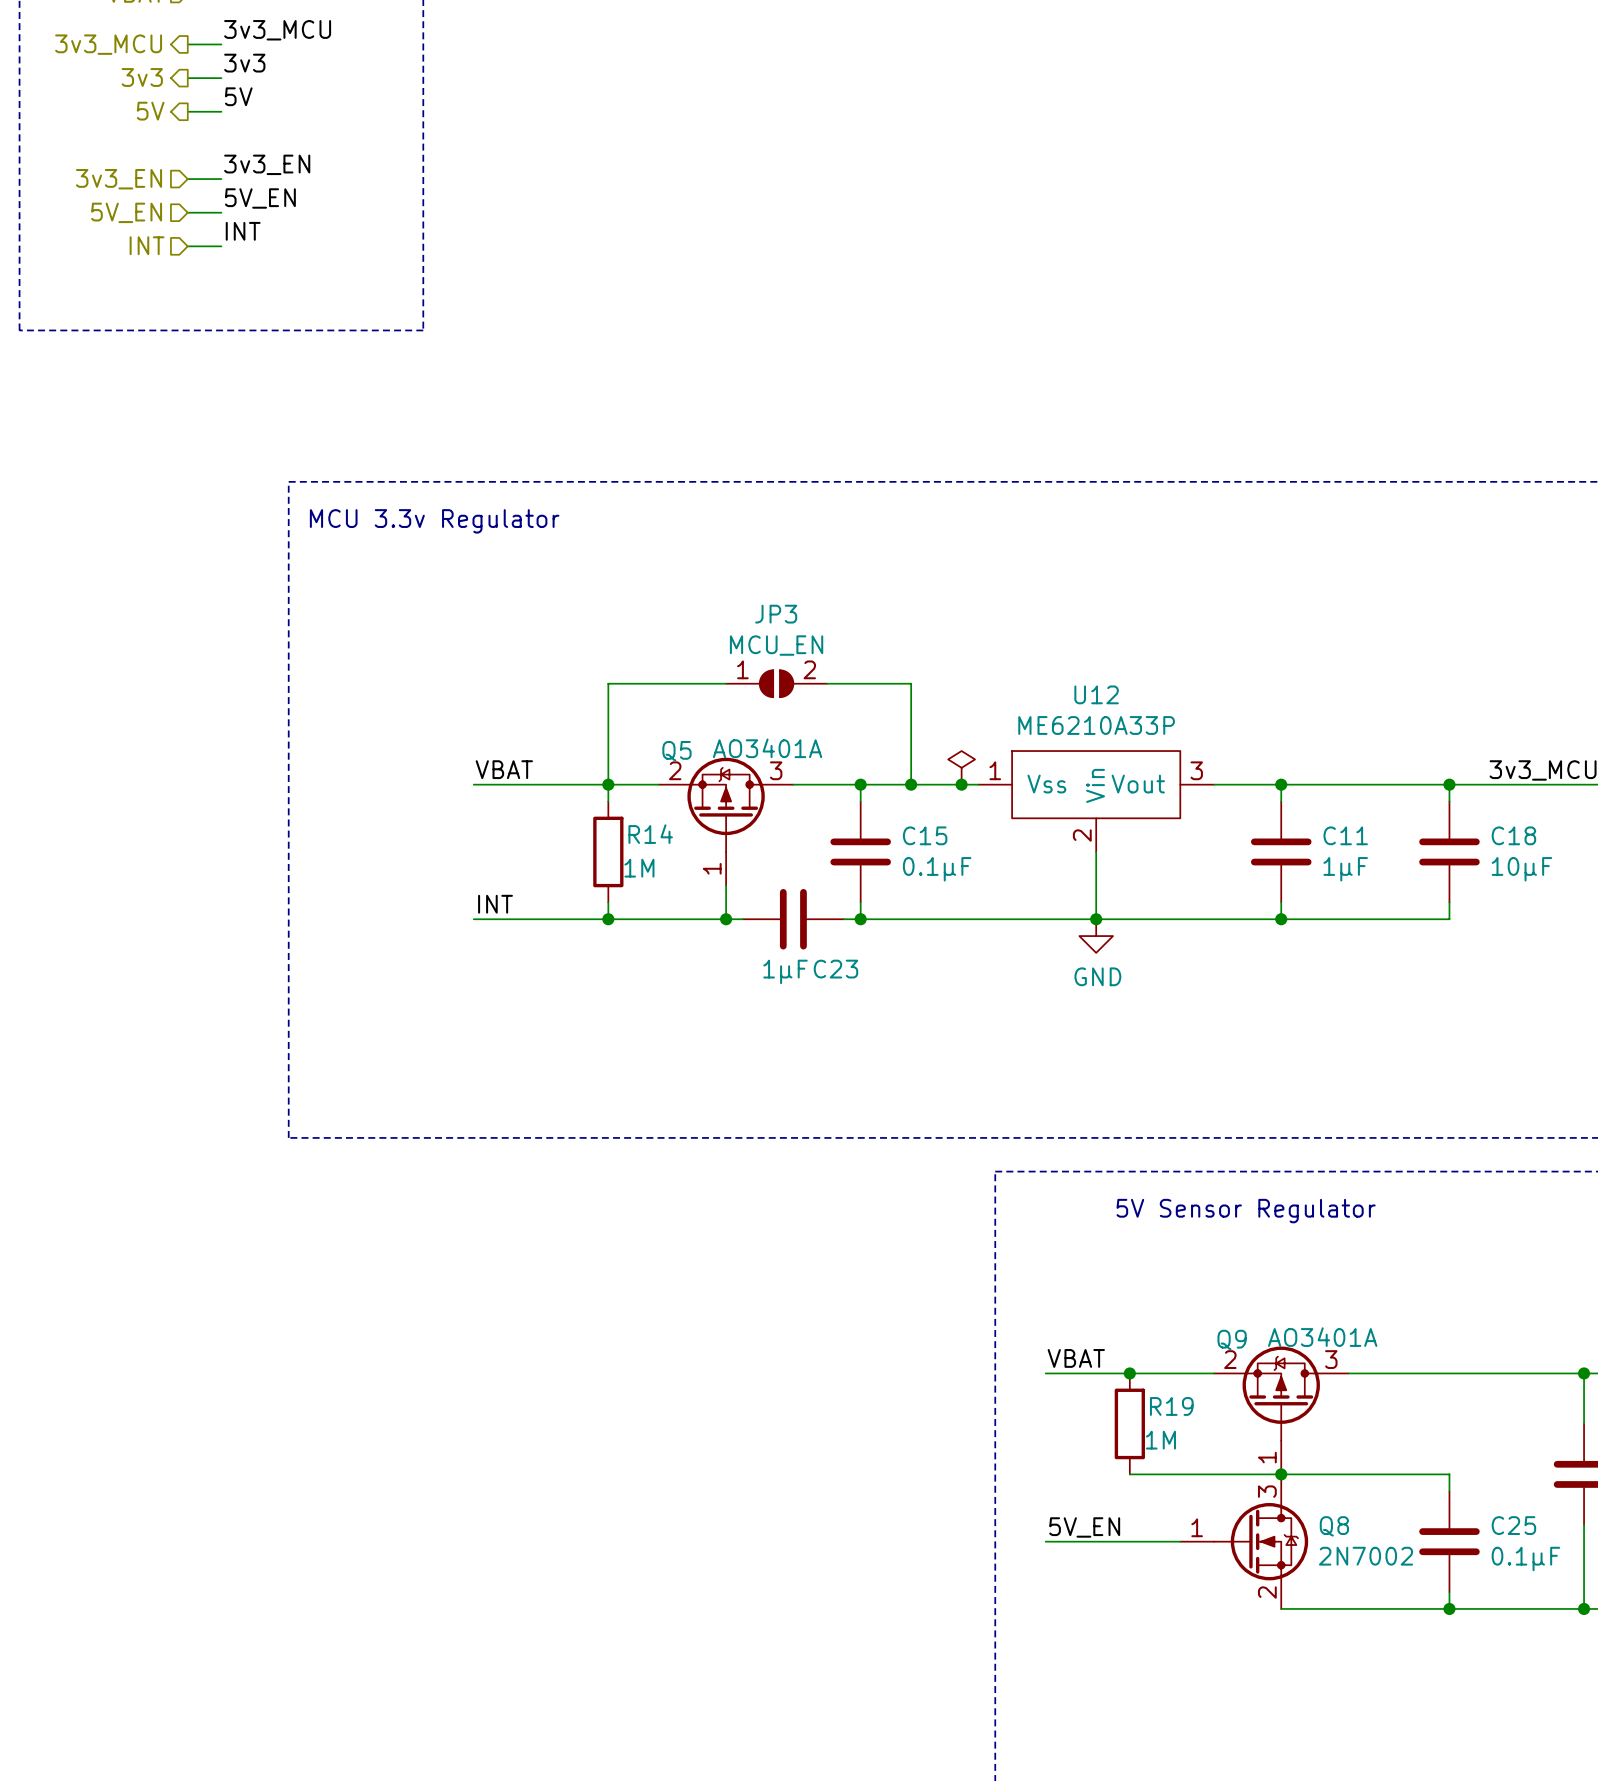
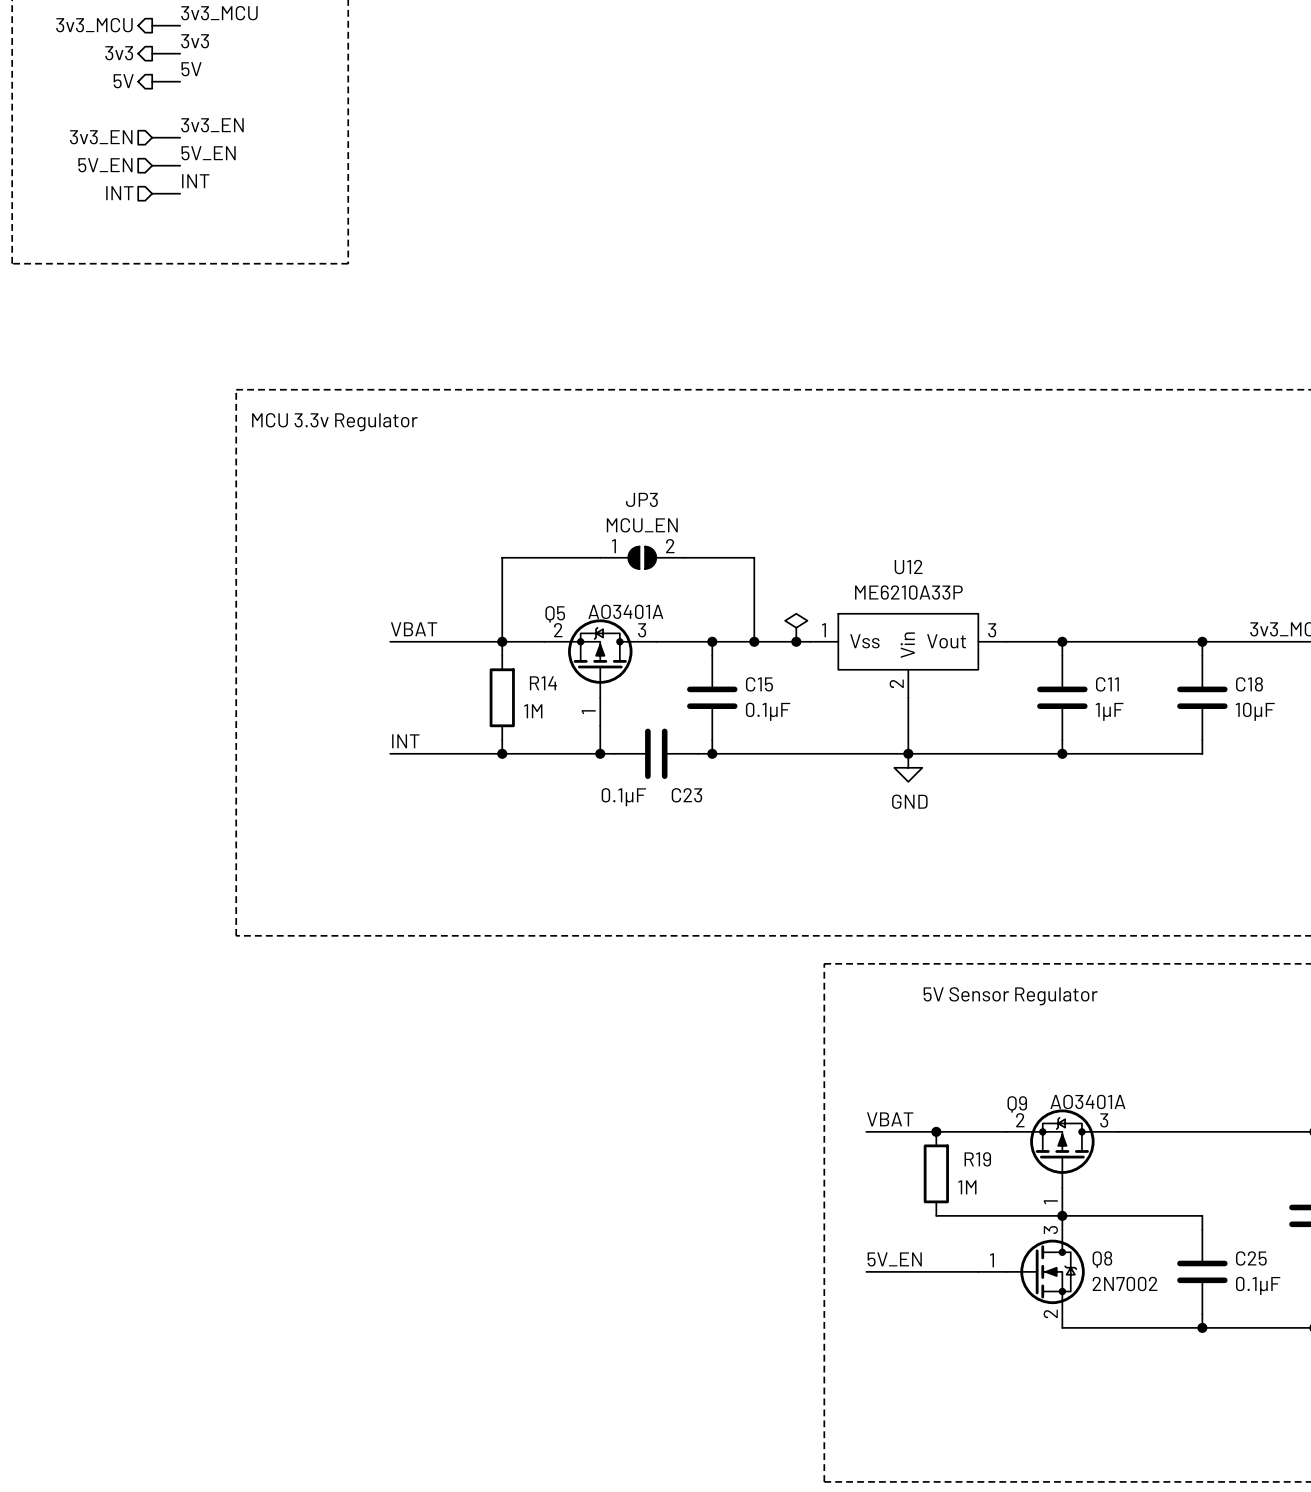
C23 value: 1µF (785, 971) -> 0.1µF (623, 797)

